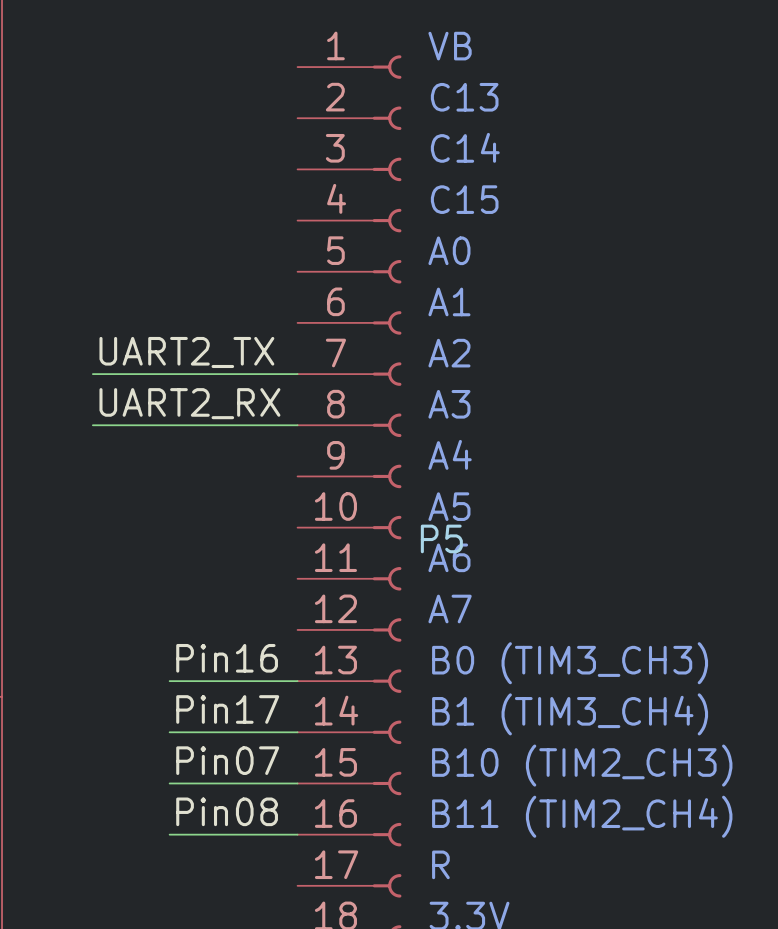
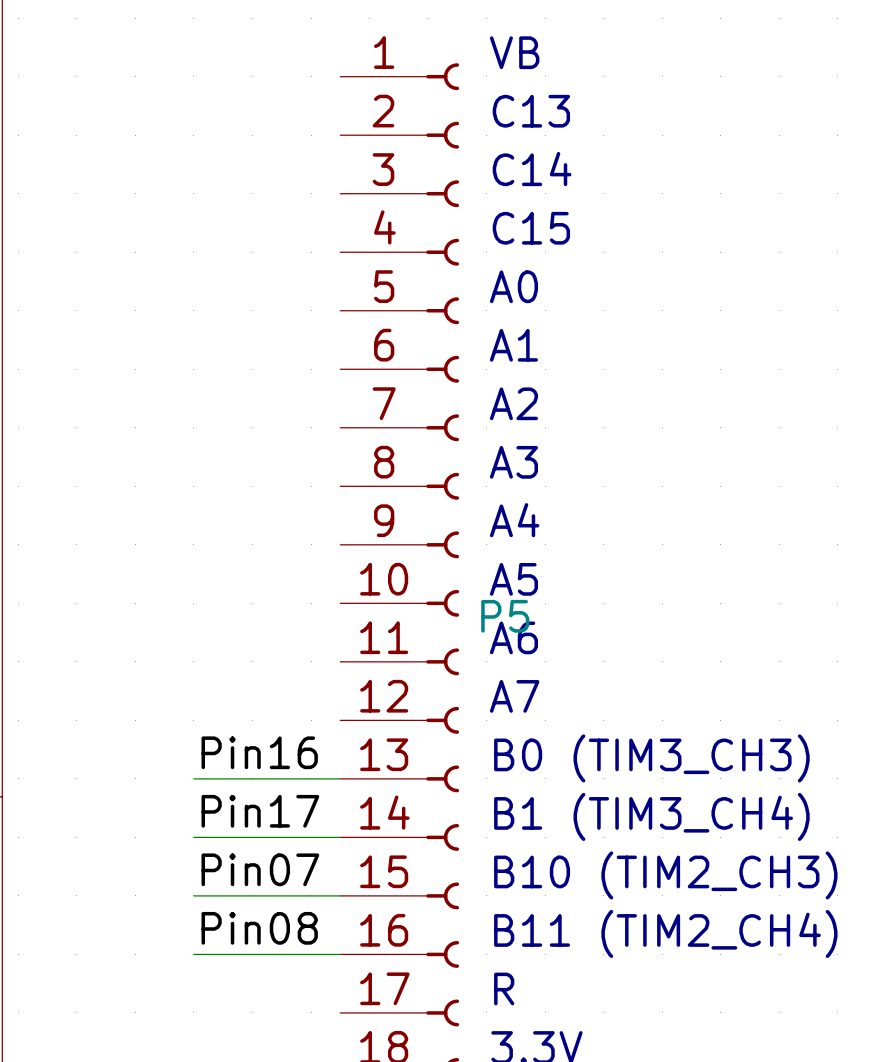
label: UART2_TX (186, 352) -> none
wire: (92, 374) (297, 374) -> none
label: UART2_RX (189, 403) -> none
wire: (92, 425) (297, 425) -> none

